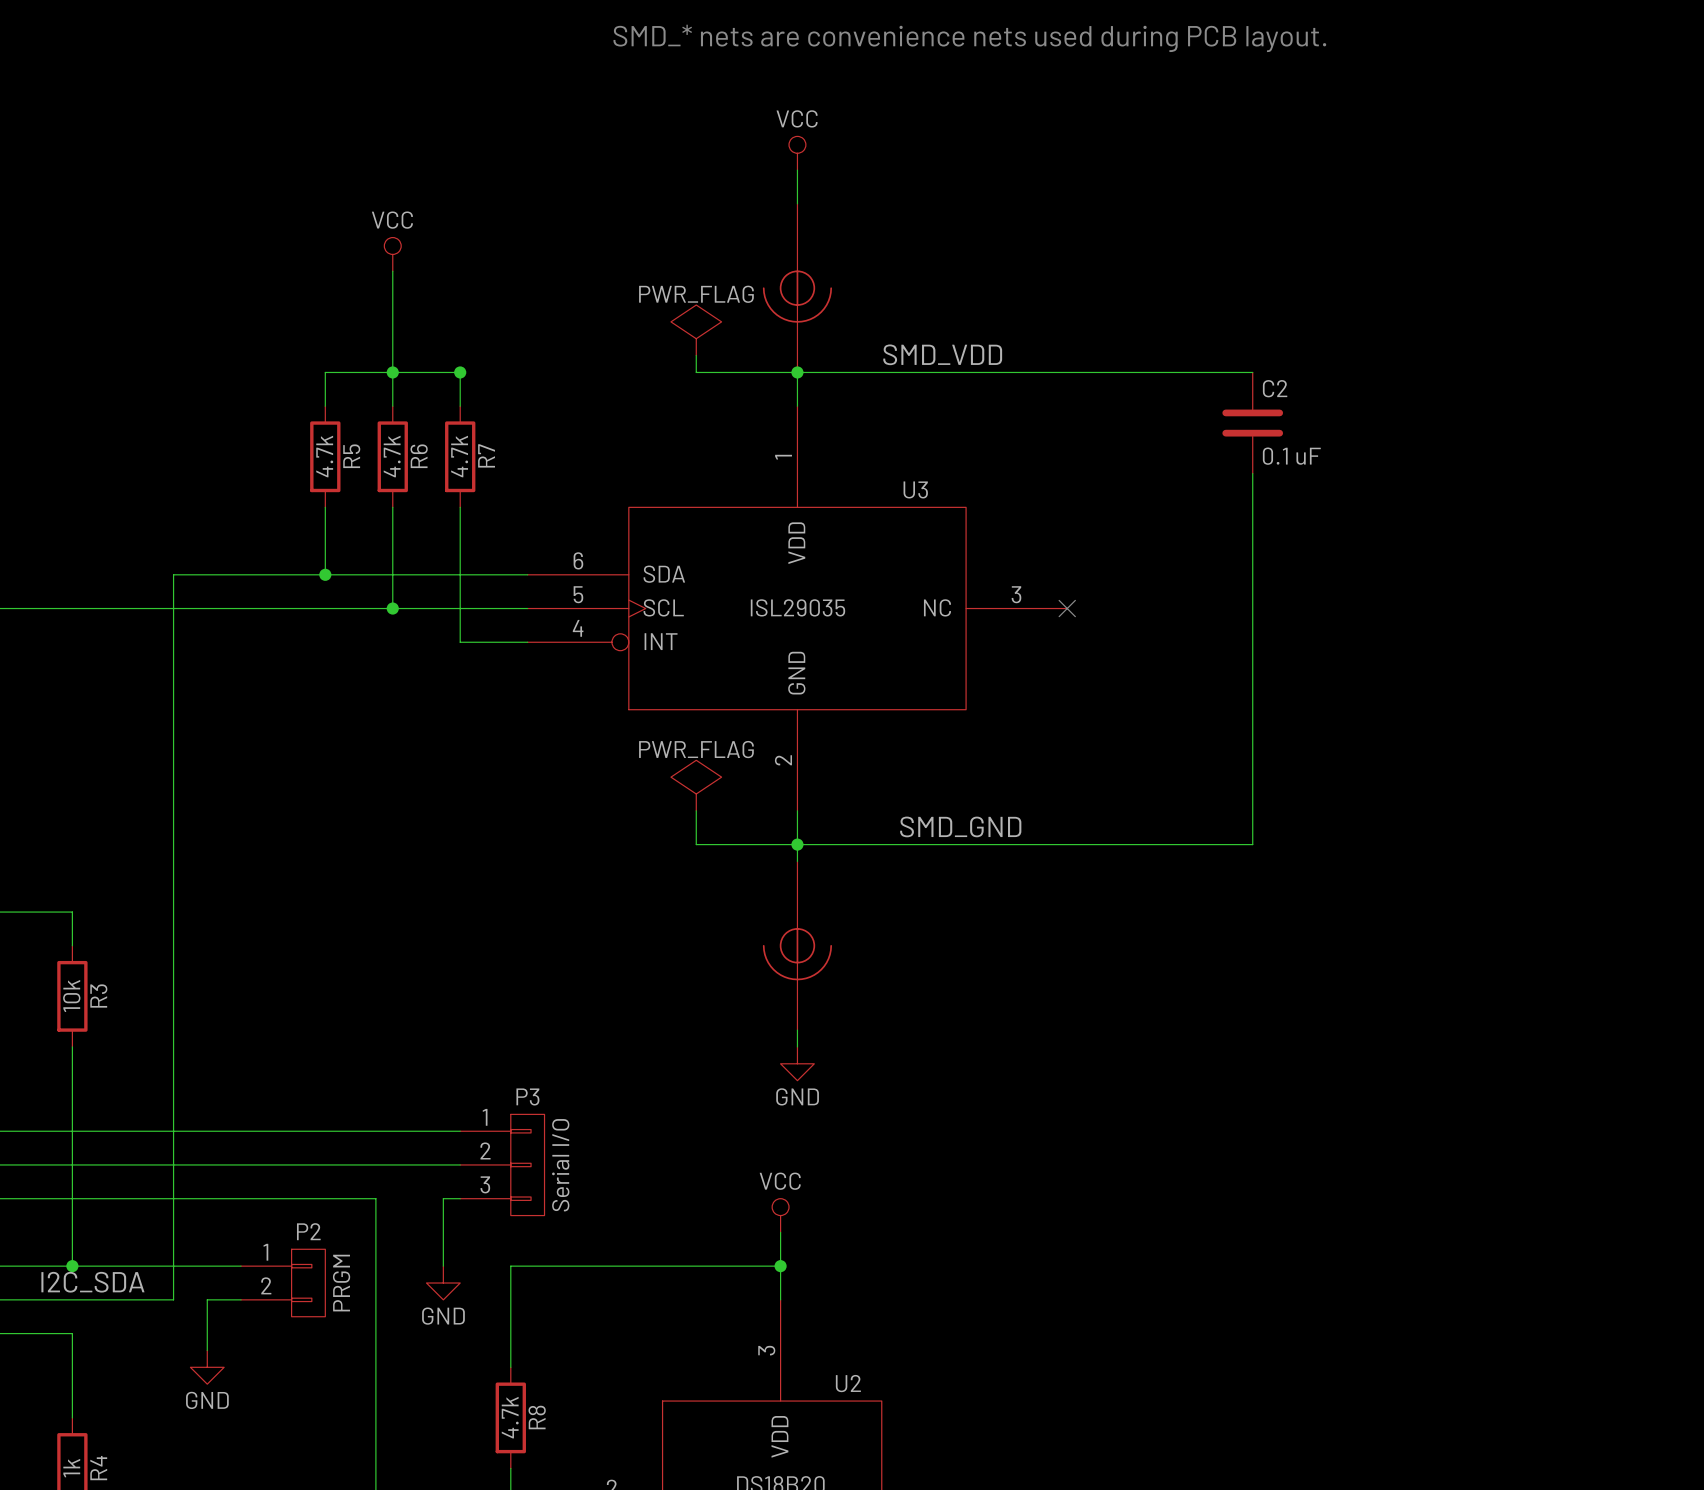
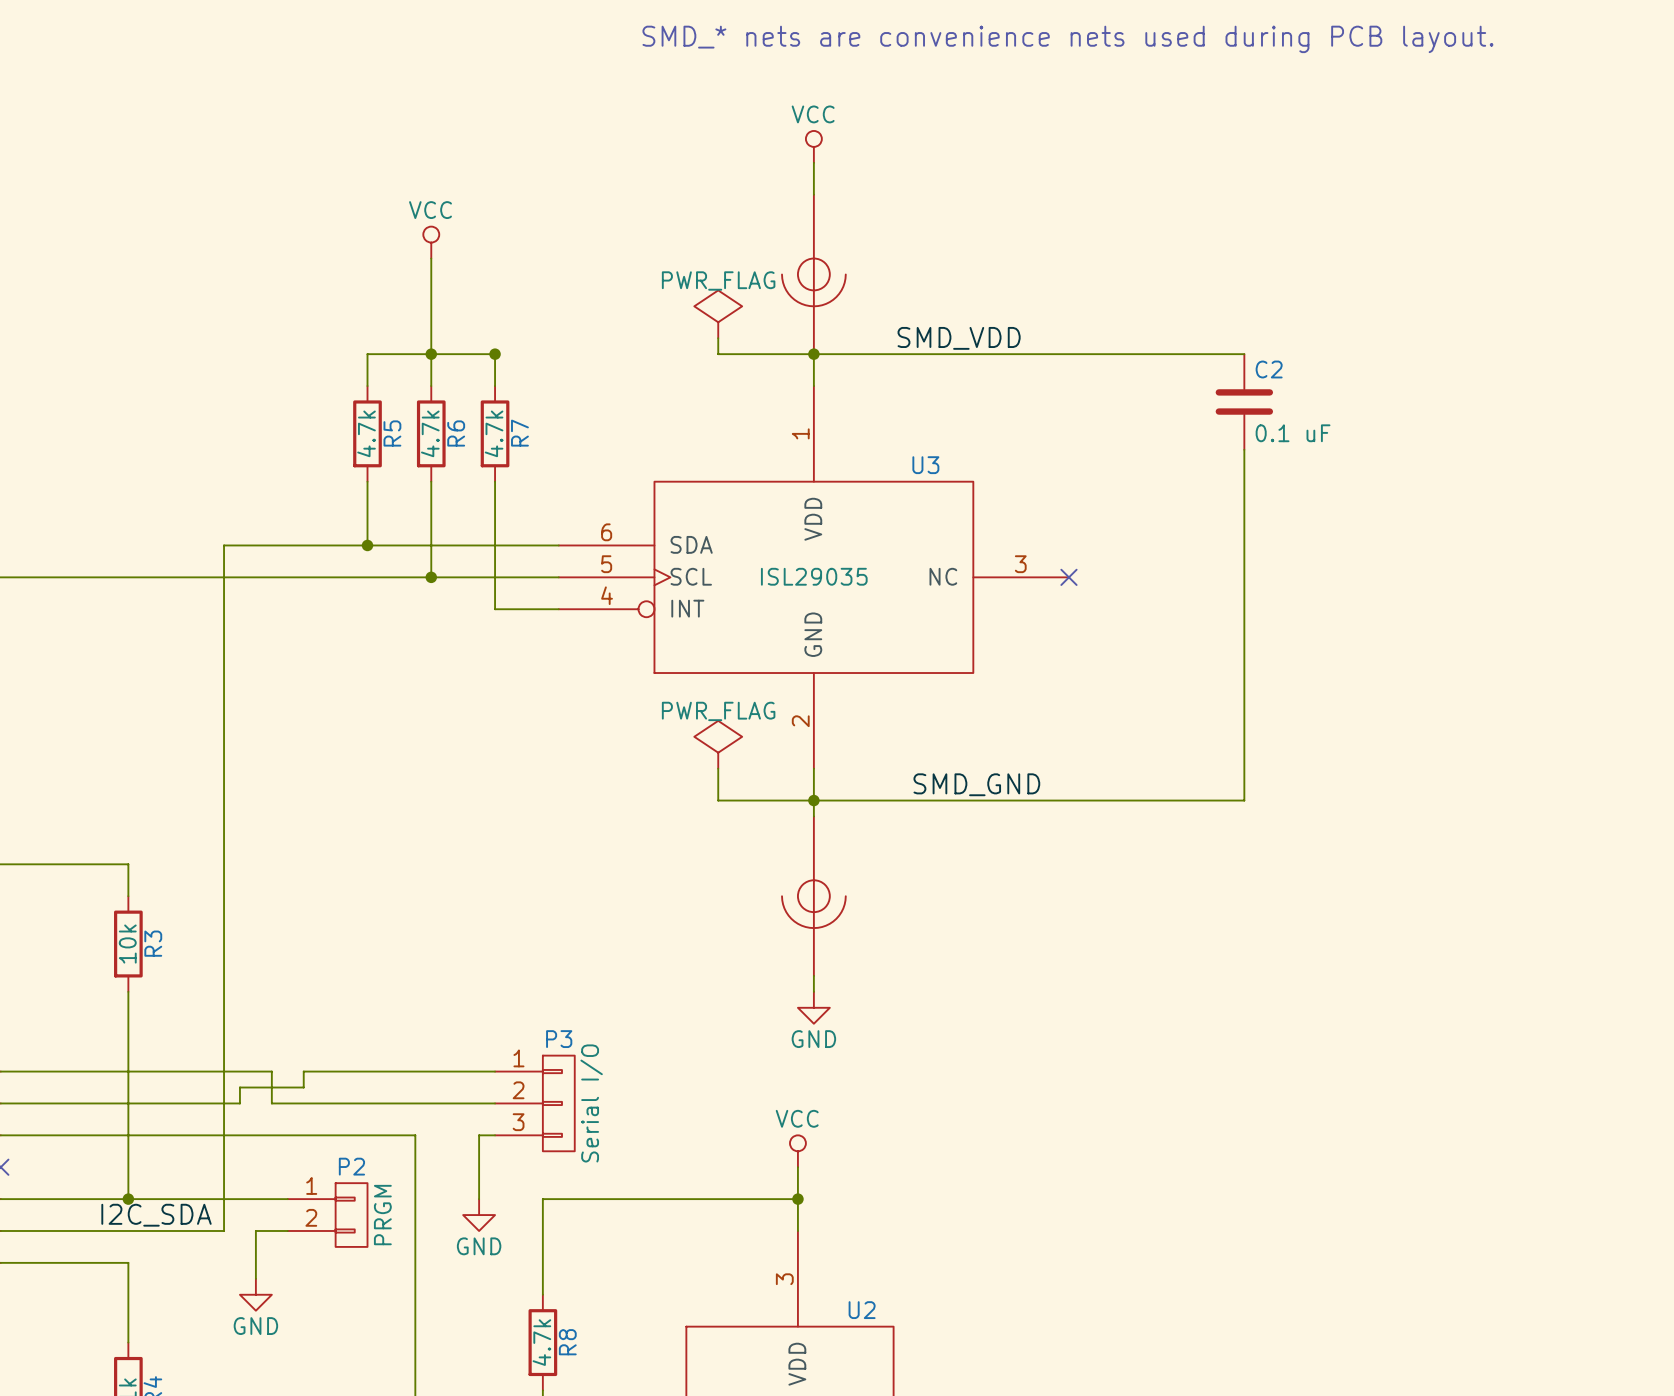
wire: (224, 1131) (257, 1131) -> (271, 1071) (271, 1103)
wire: (190, 1164) (224, 1164) -> (239, 1103) (239, 1087) (303, 1087) (303, 1071)

